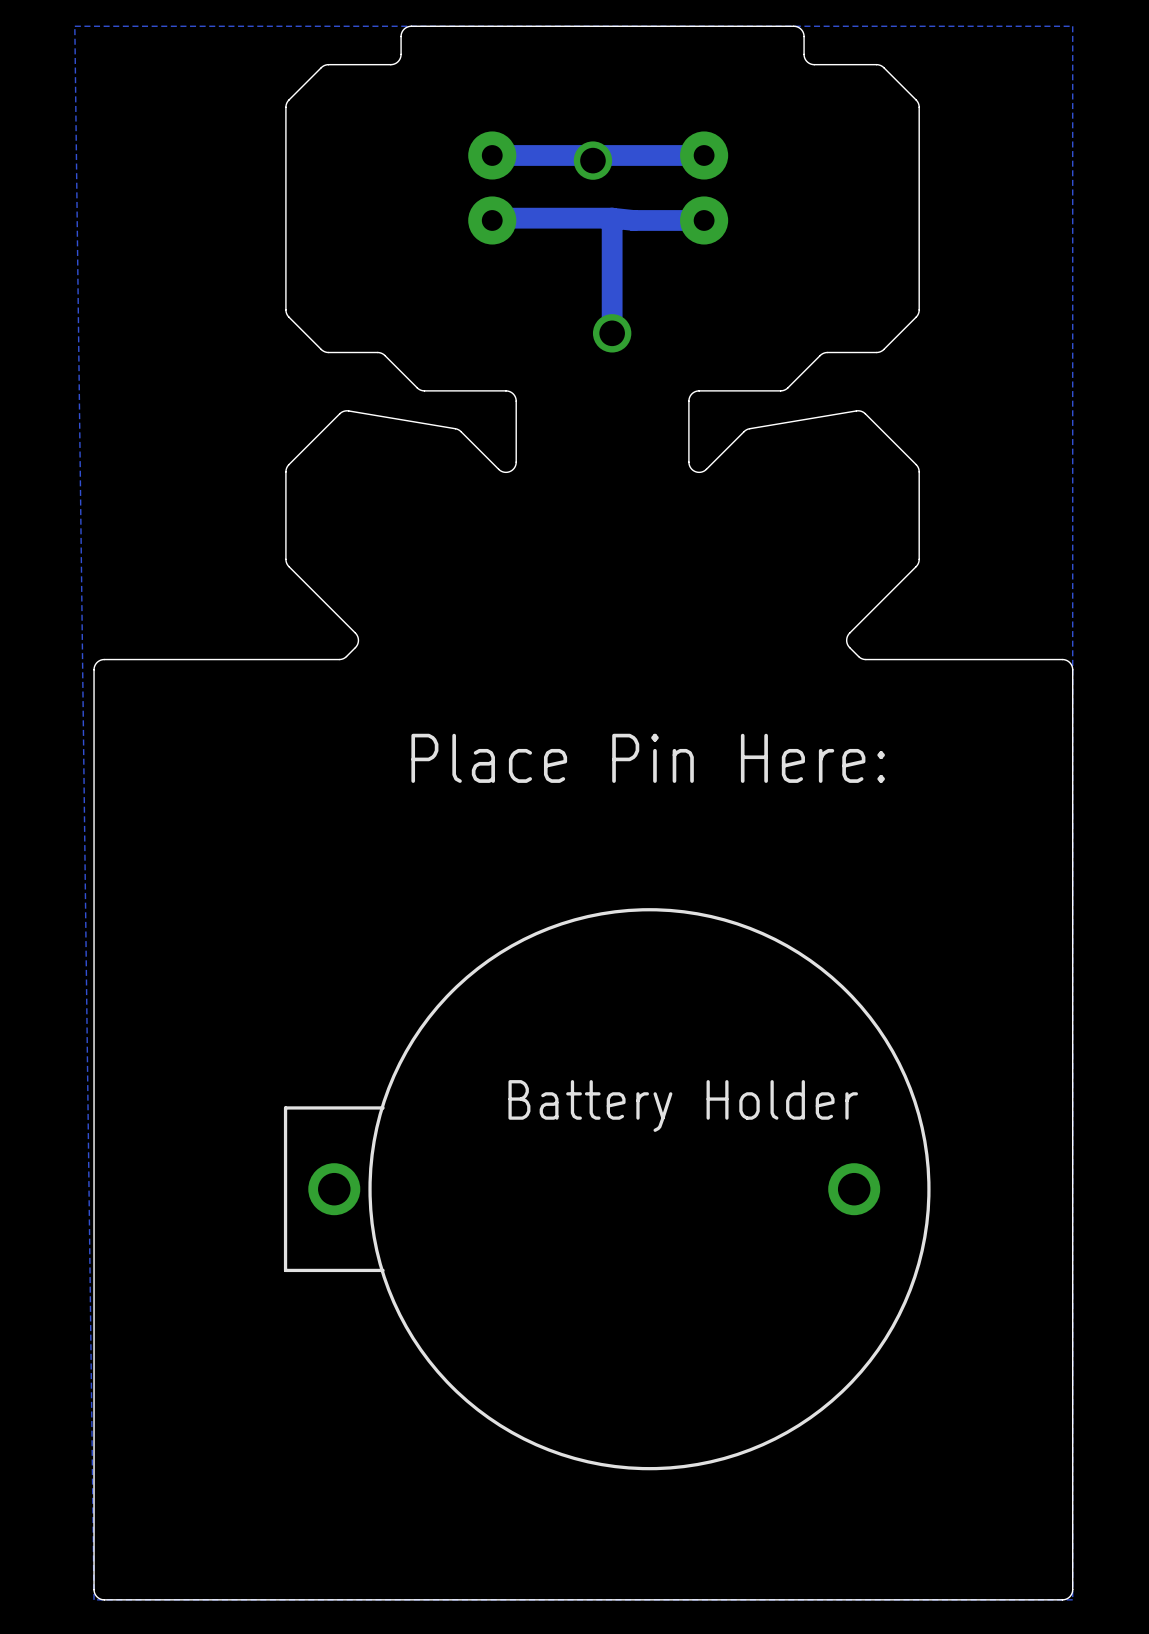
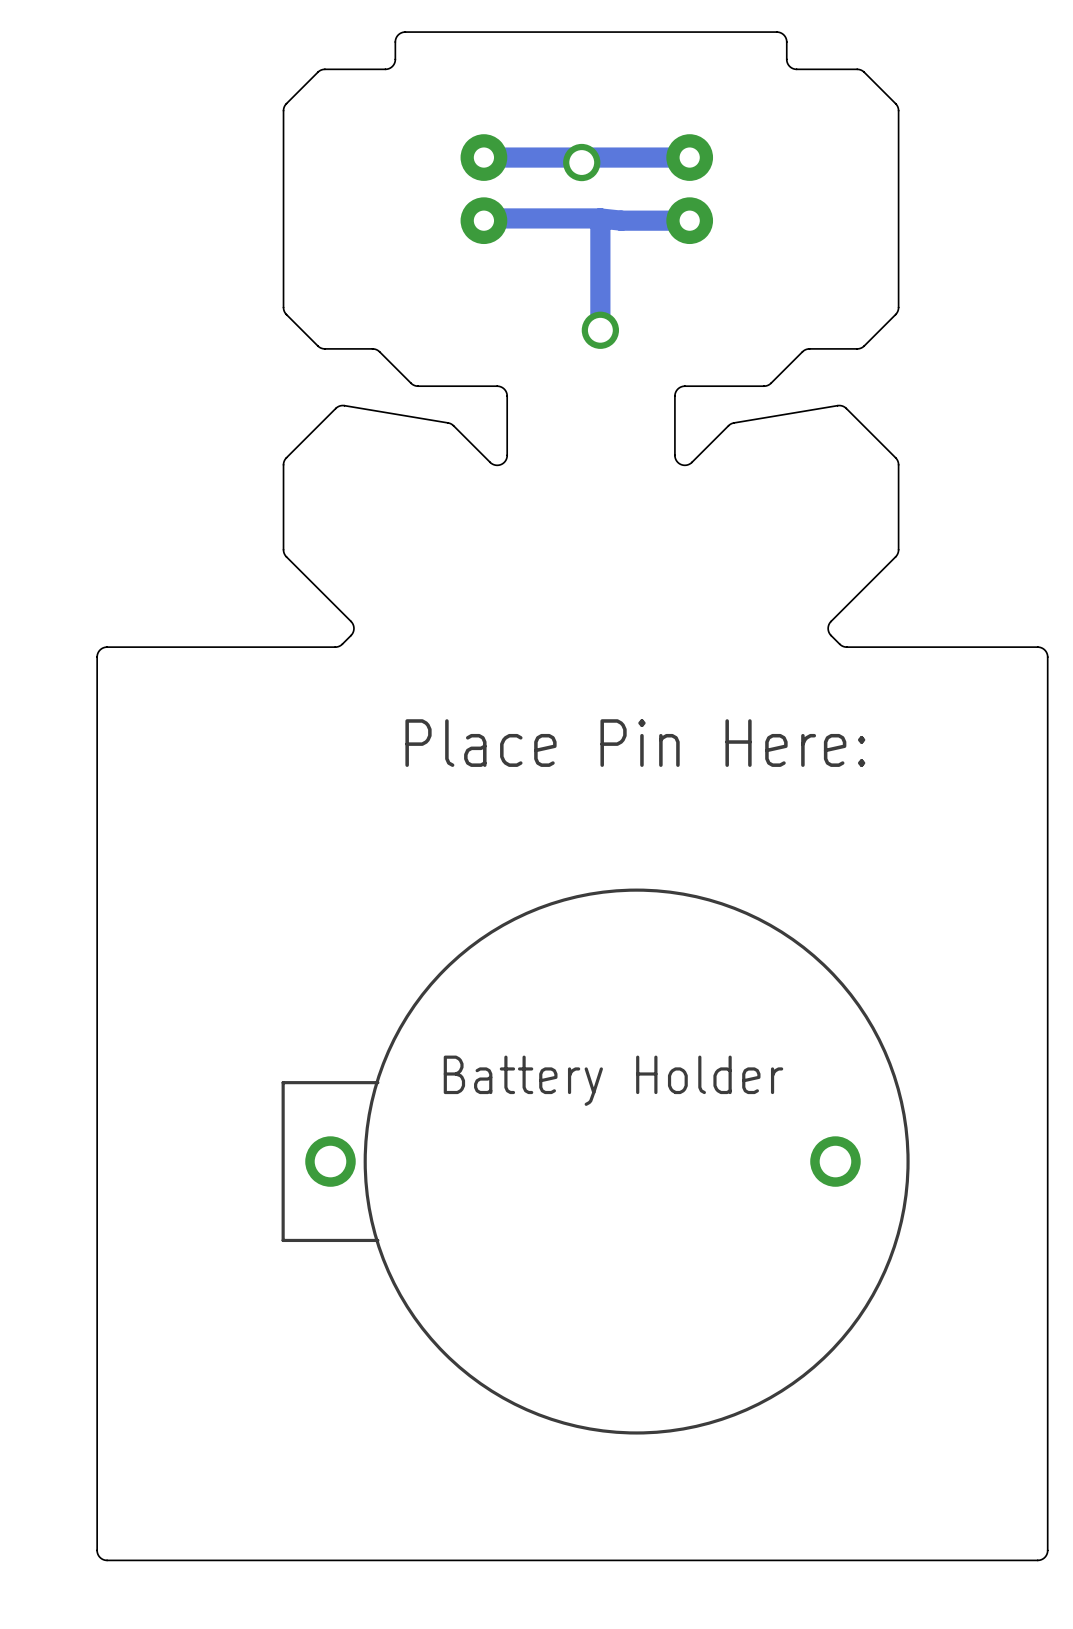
zone outline: (1072, 26) (74, 26) (94, 1599) (1072, 1599) (1072, 26) -> none
text position: Battery Holder (683, 1105) -> Battery Holder (613, 1080)

